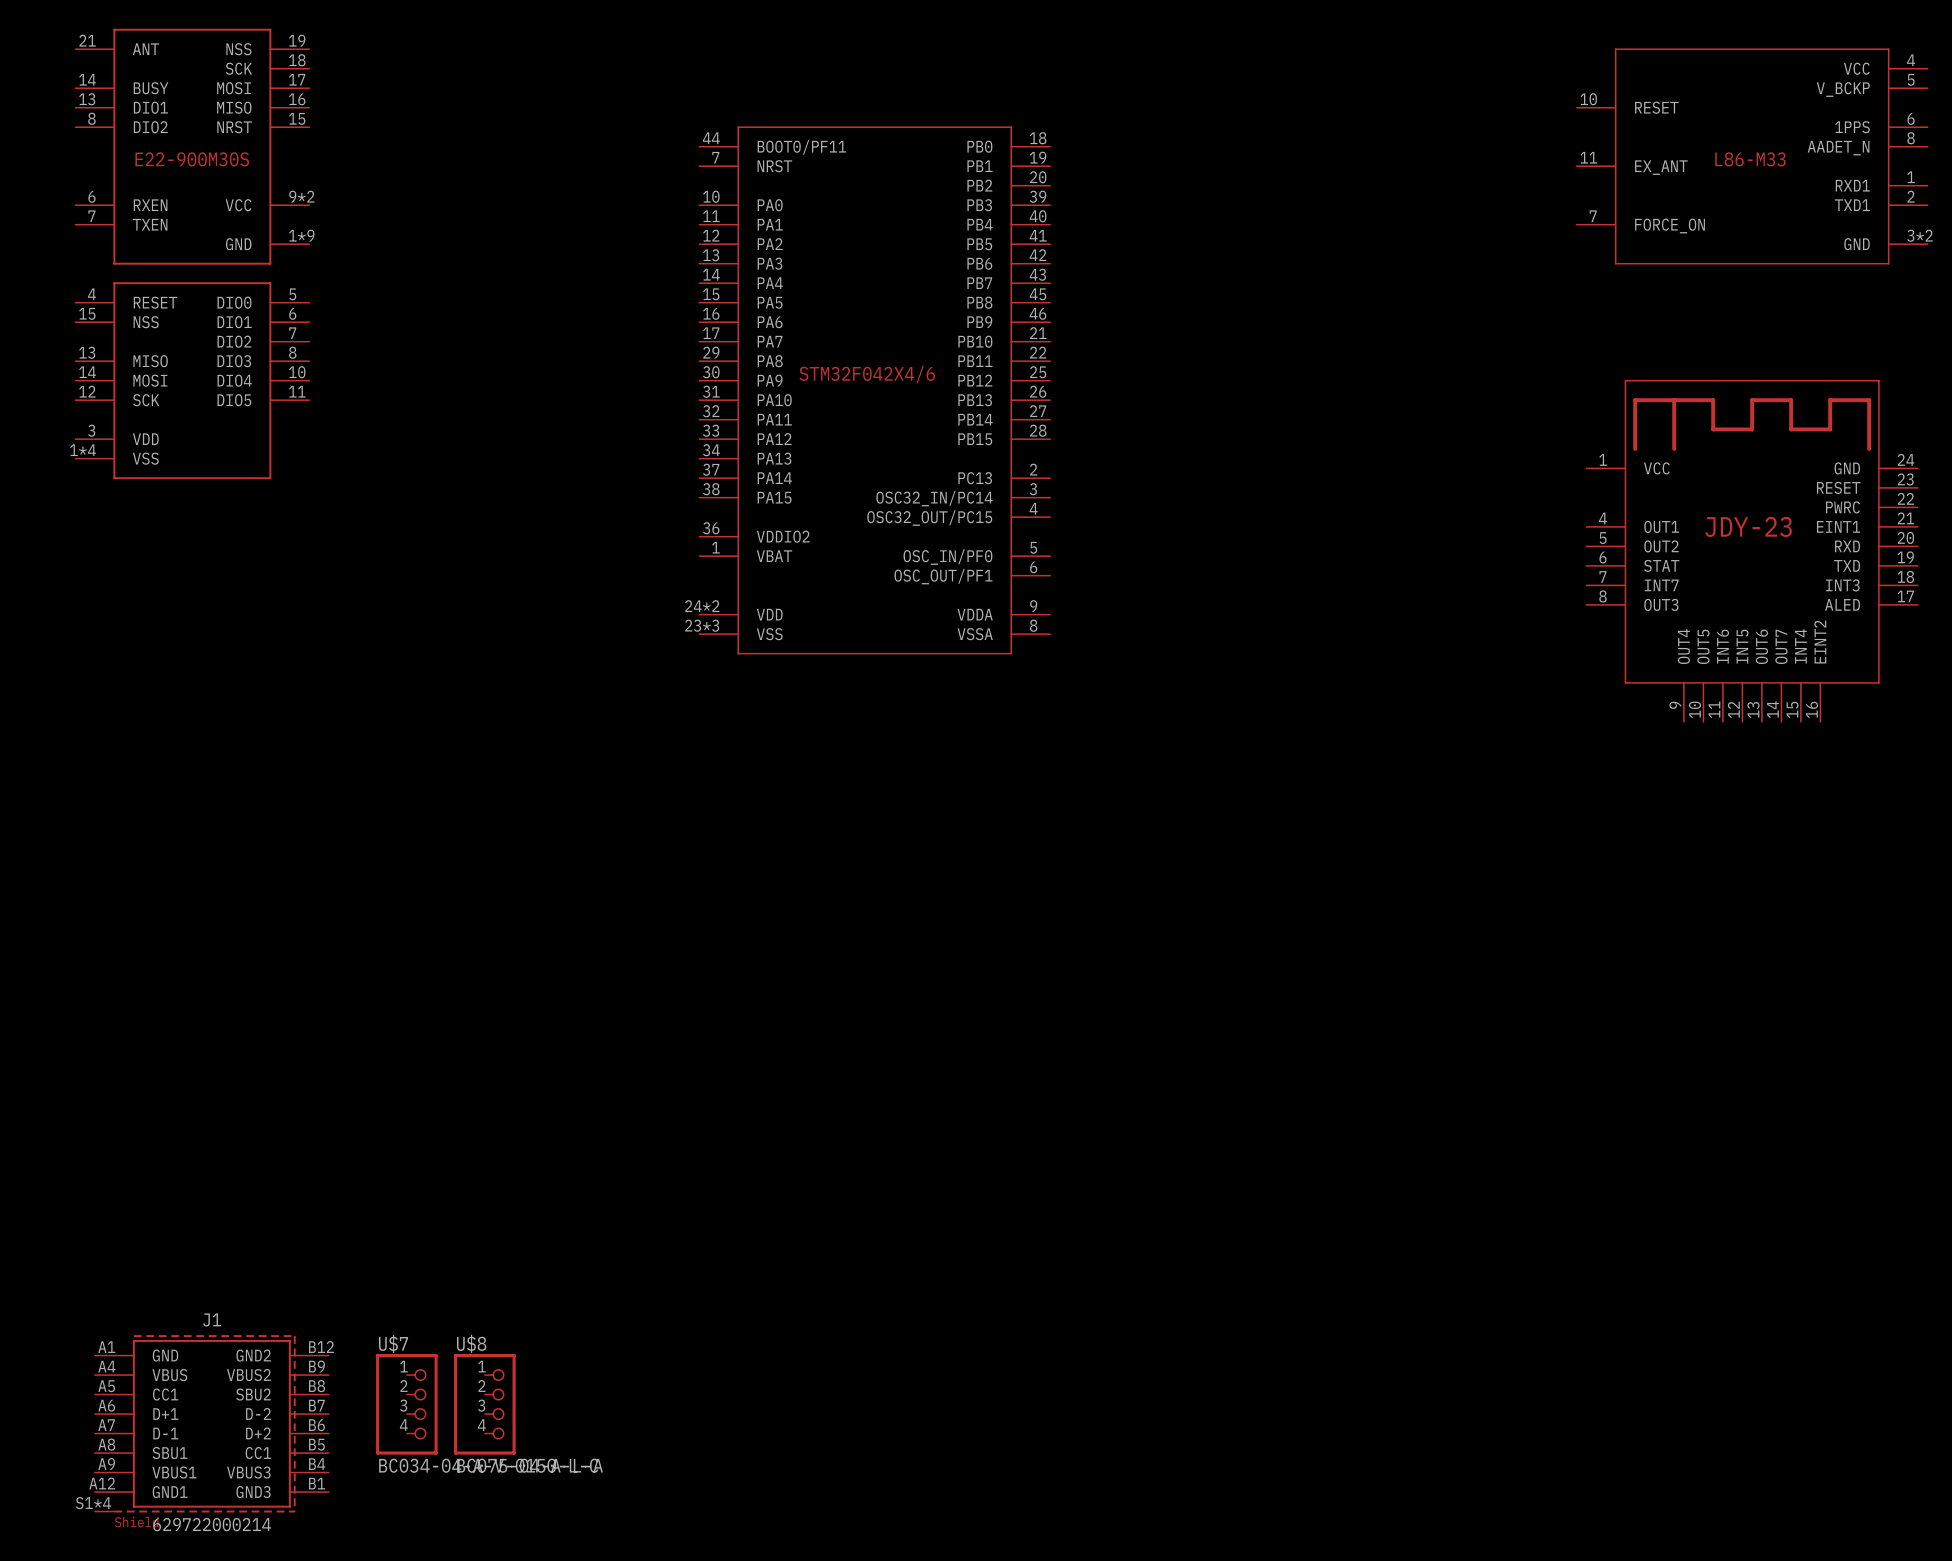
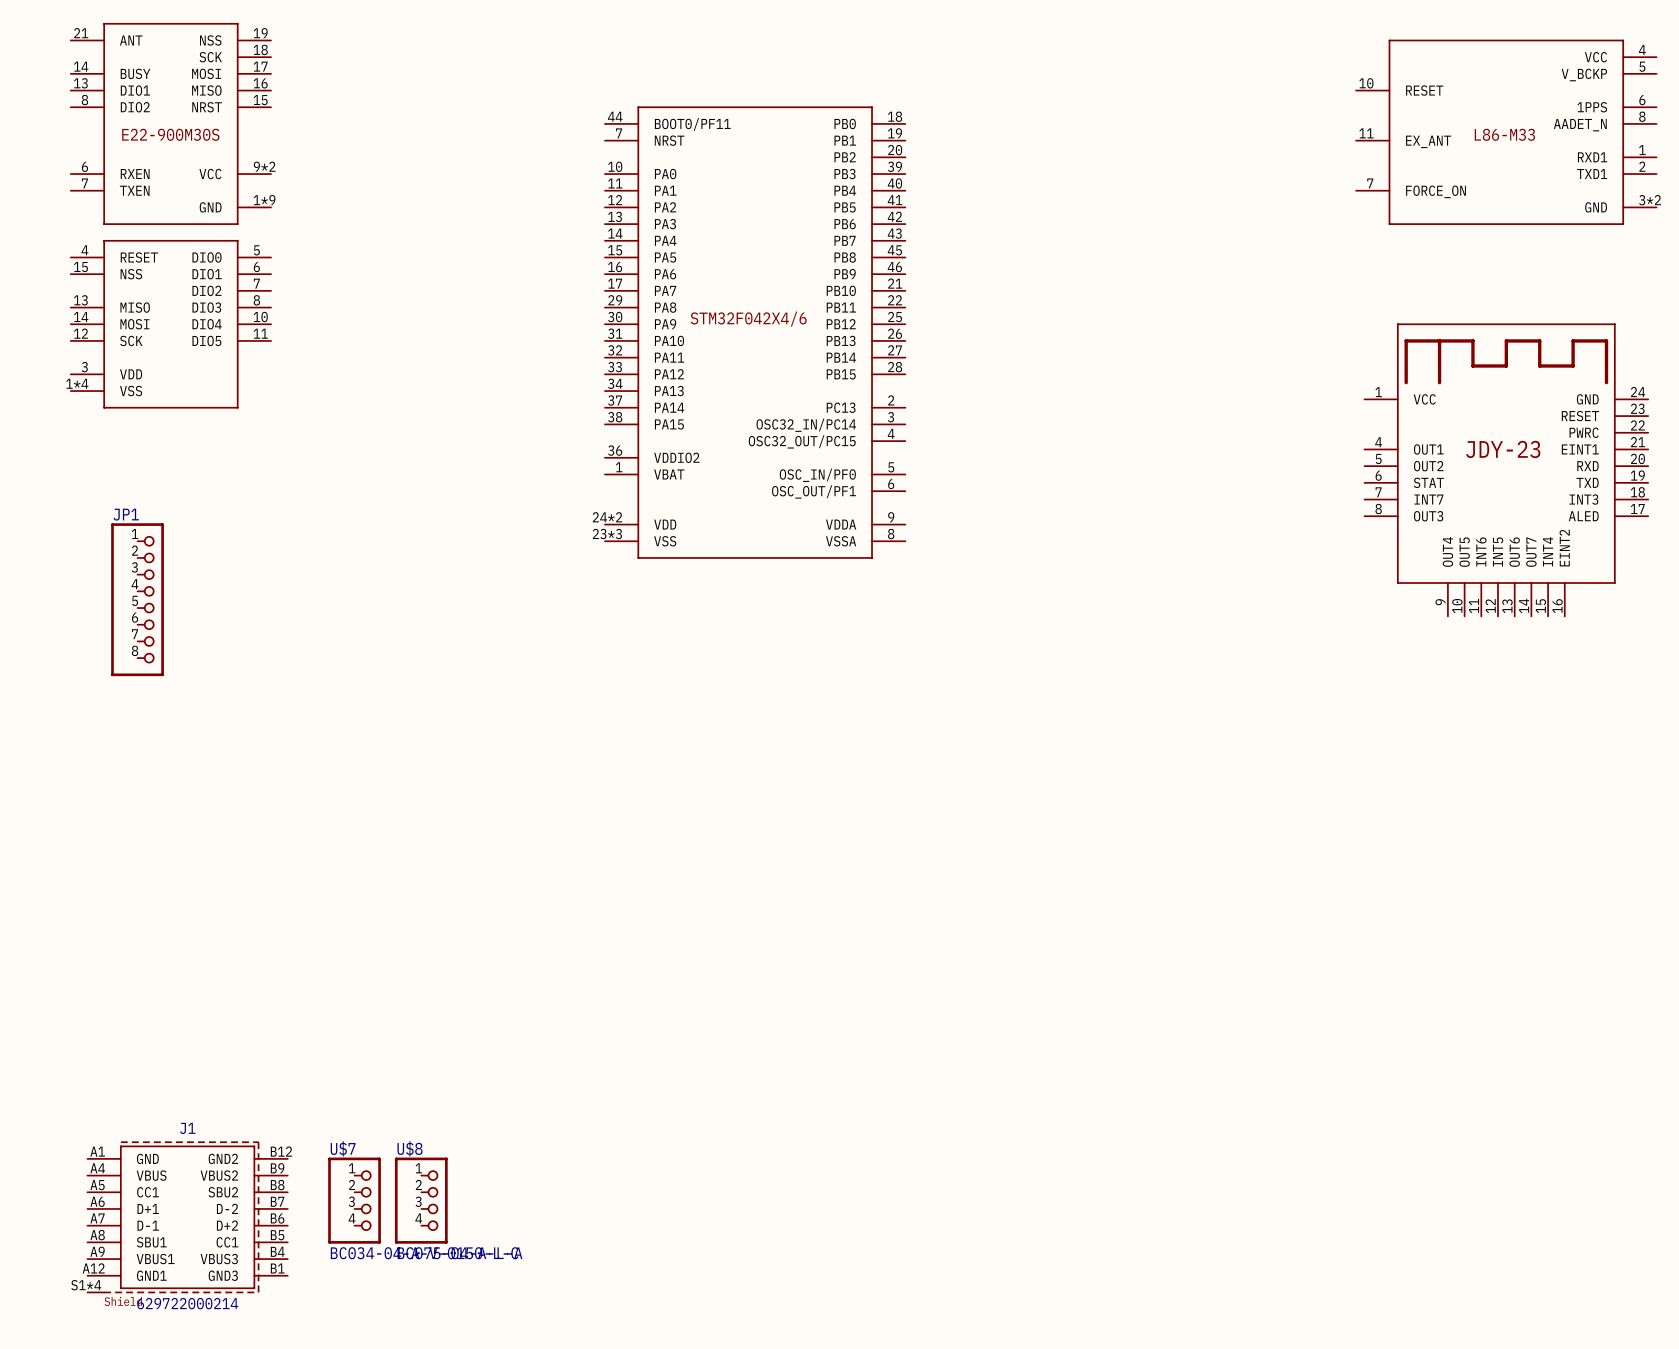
JP1: none -> (137, 599)

